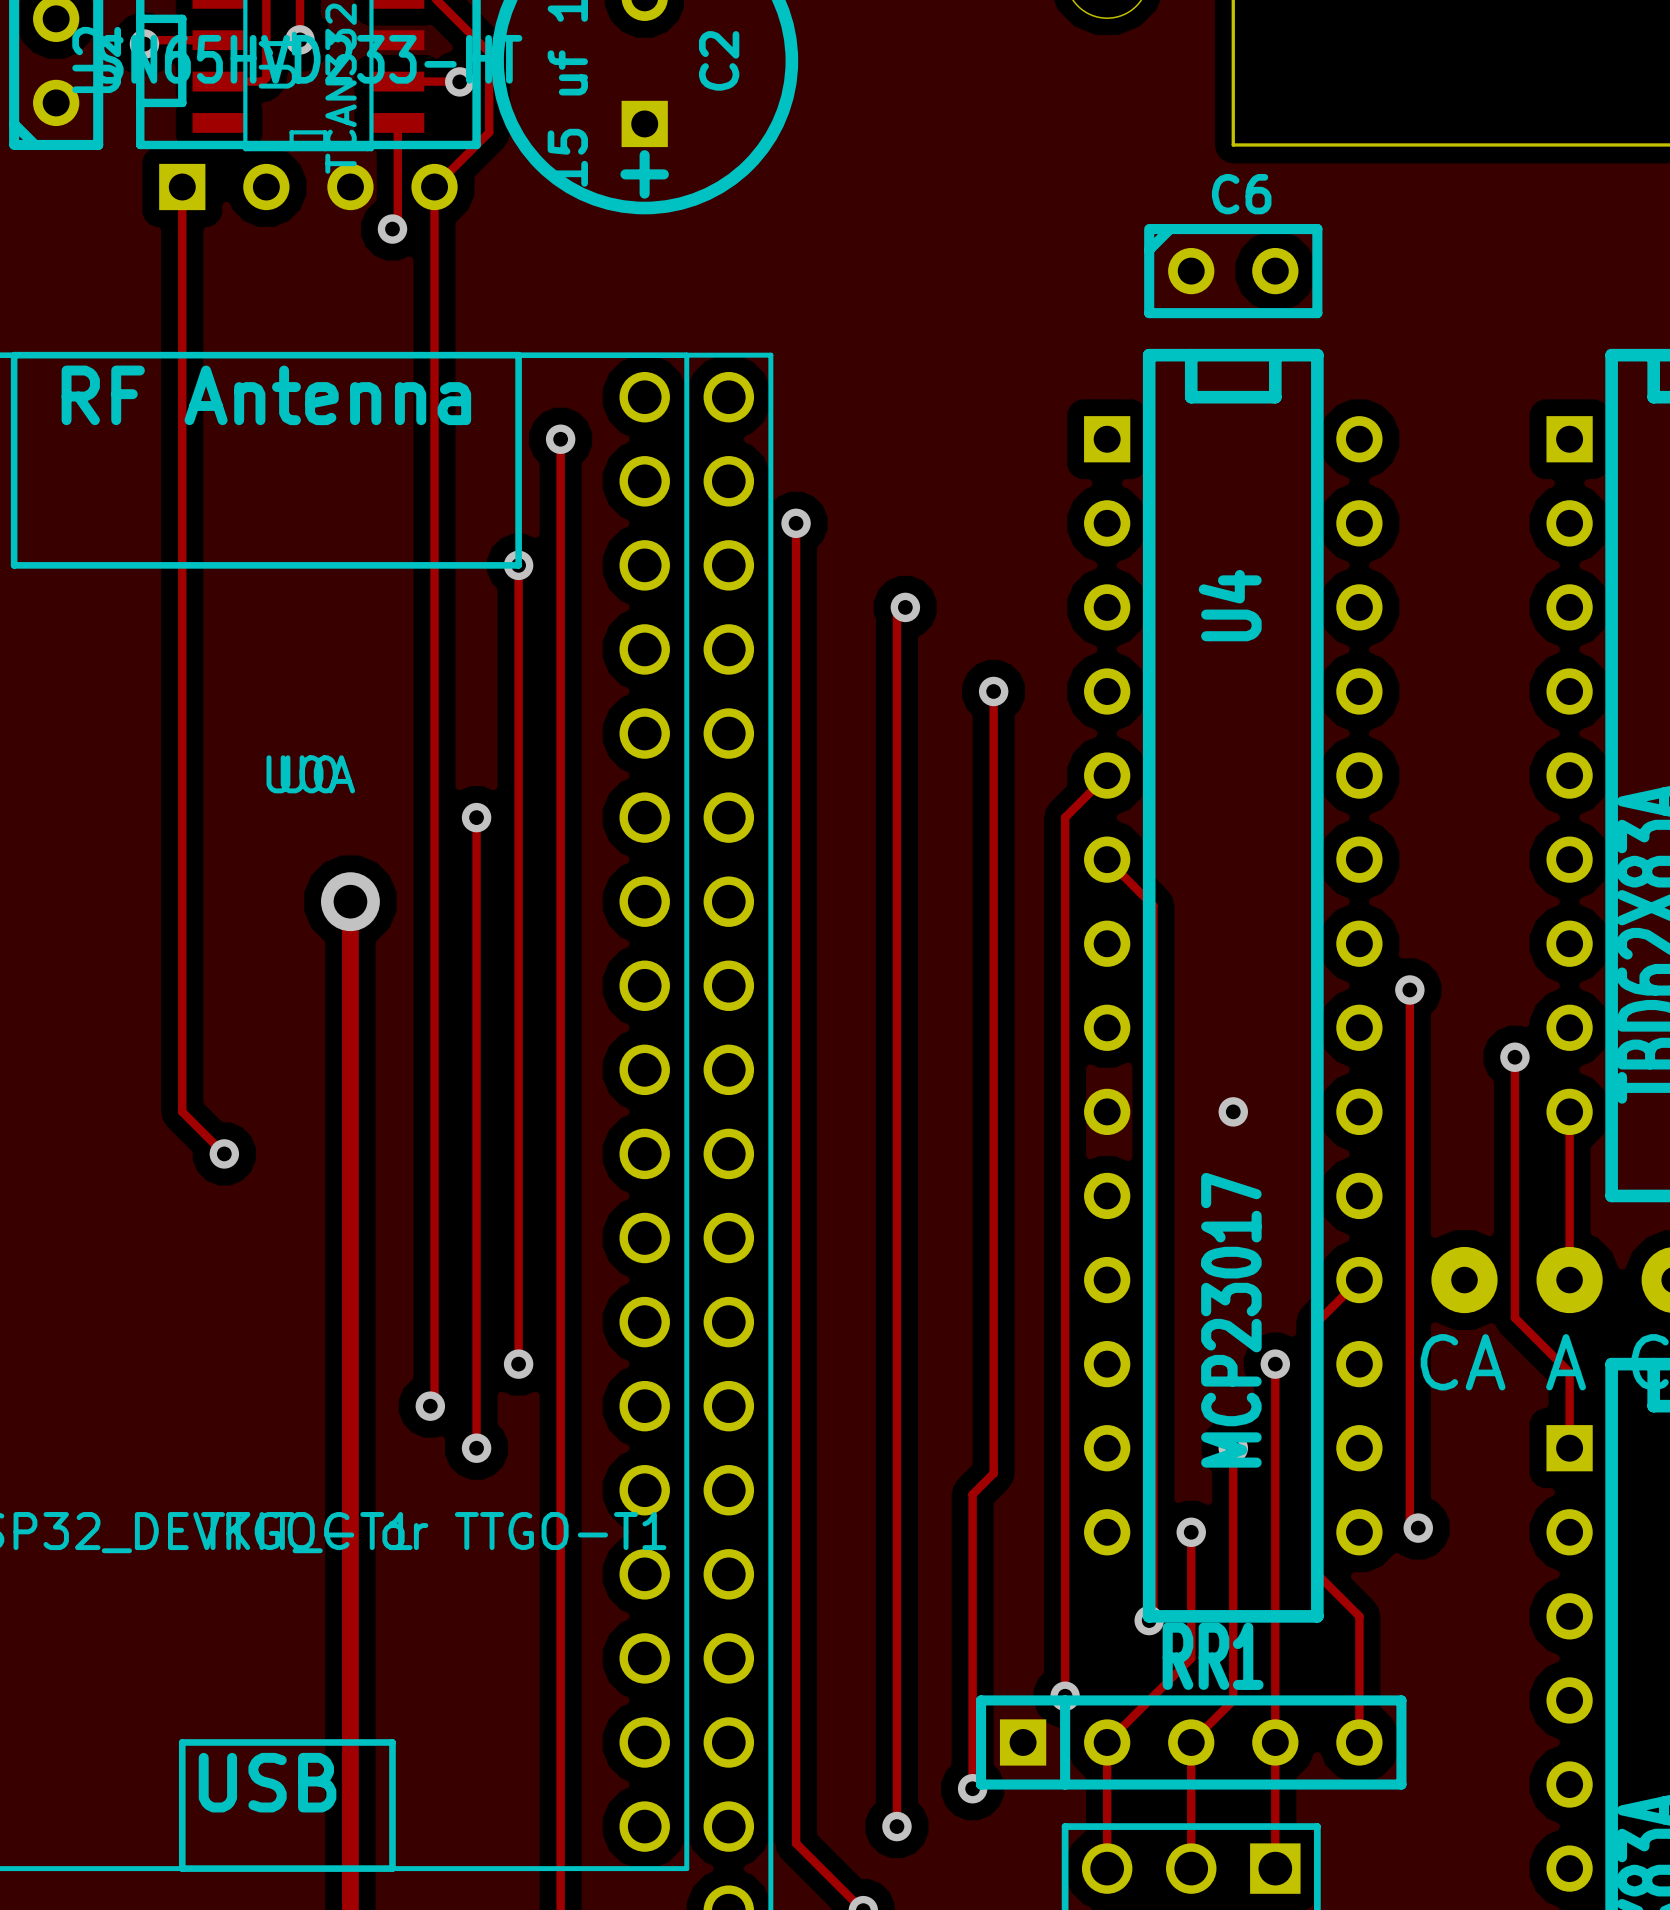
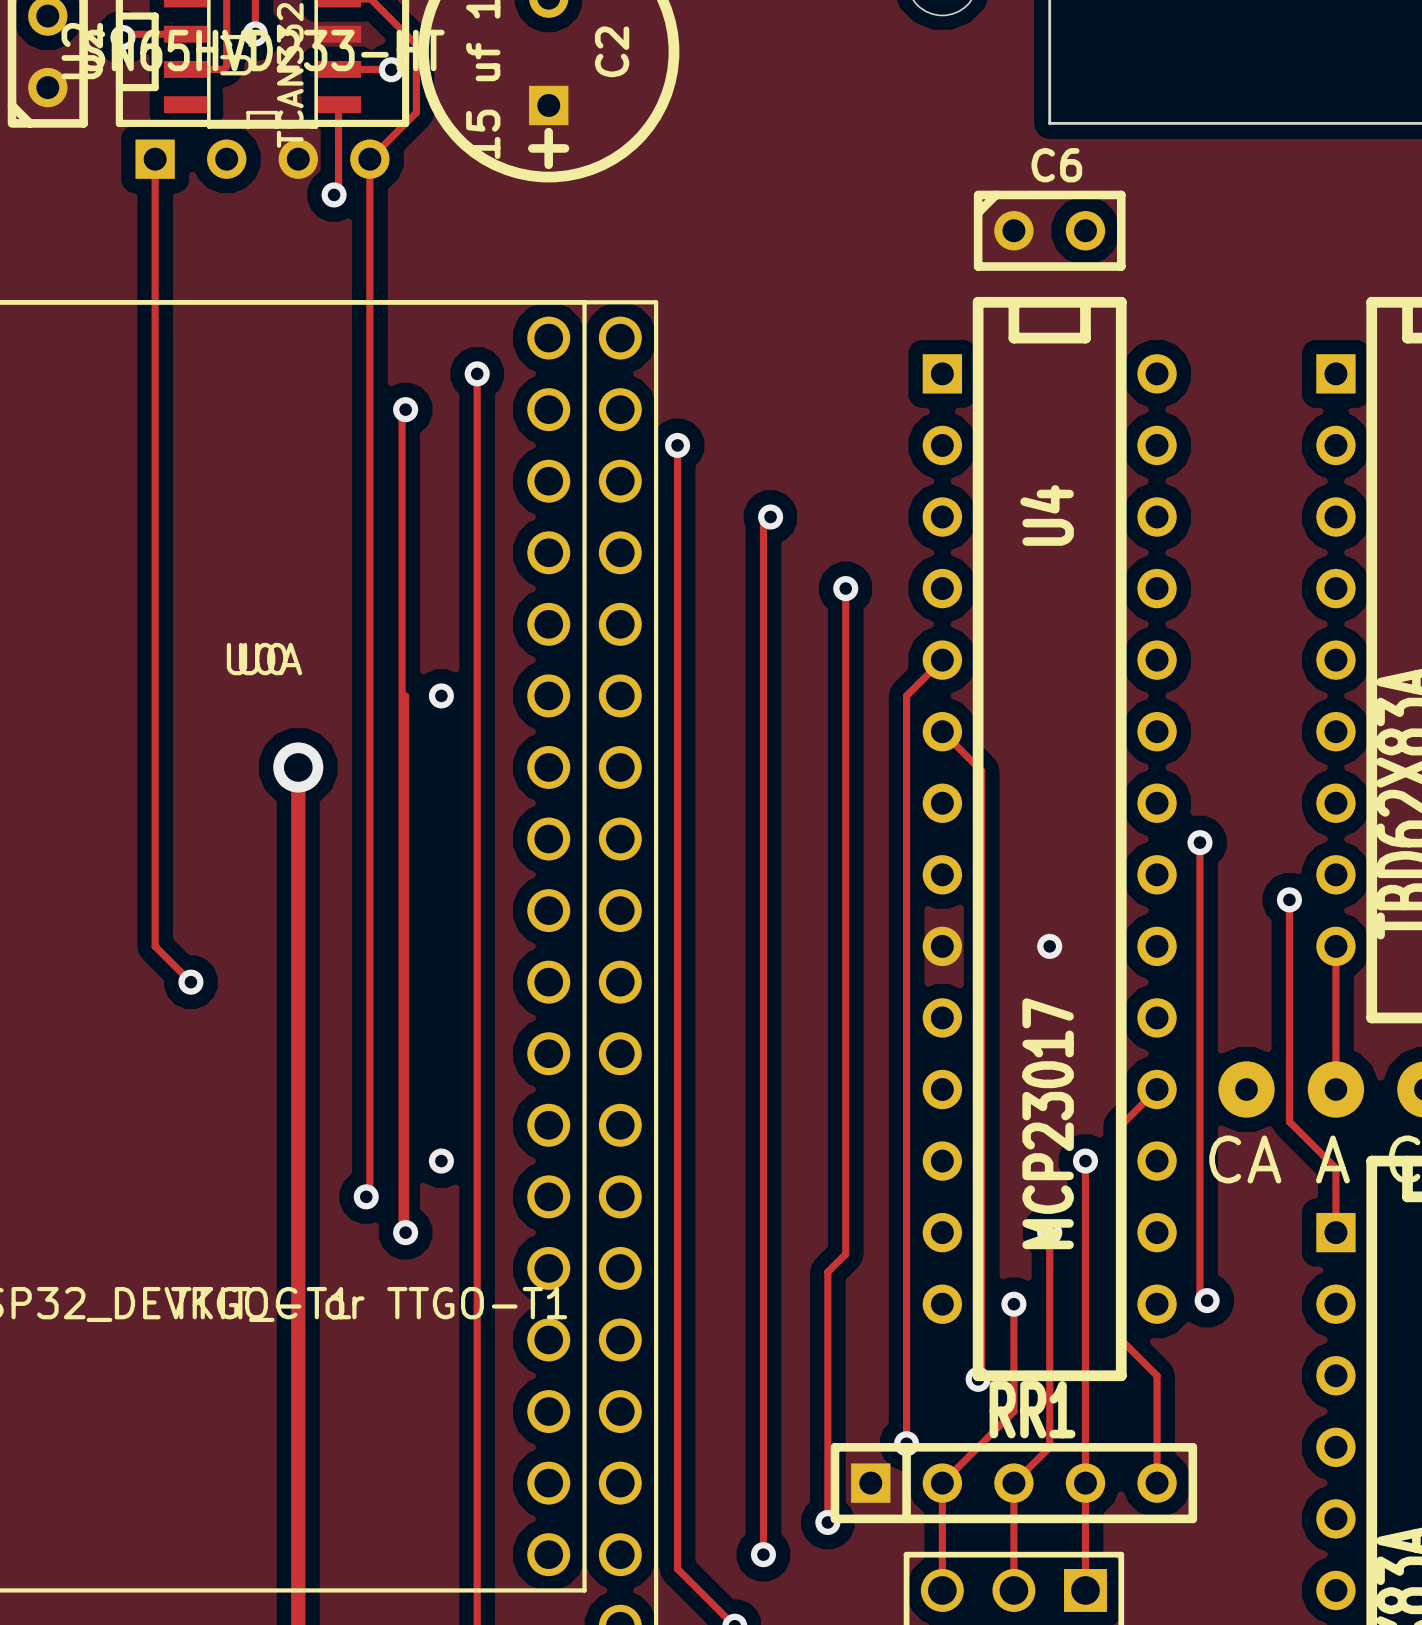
line: (14, 355) (518, 355) (518, 565) (14, 565) (14, 355) -> none
text: RF Antenna (266, 395) -> none
track: none -> (405, 409) (402, 413) (402, 1229)
track: (518, 565) (518, 1364) -> none
via position: (518, 565) -> (405, 409)
via position: (476, 817) -> (441, 695)
line: (182, 1742) (392, 1742) (392, 1868) (182, 1868) (182, 1742) -> none
text: USB (267, 1782) -> none

